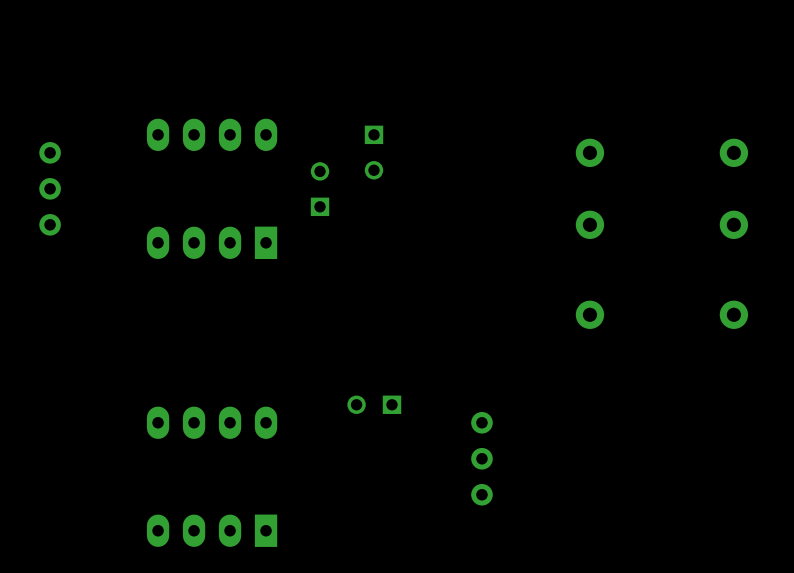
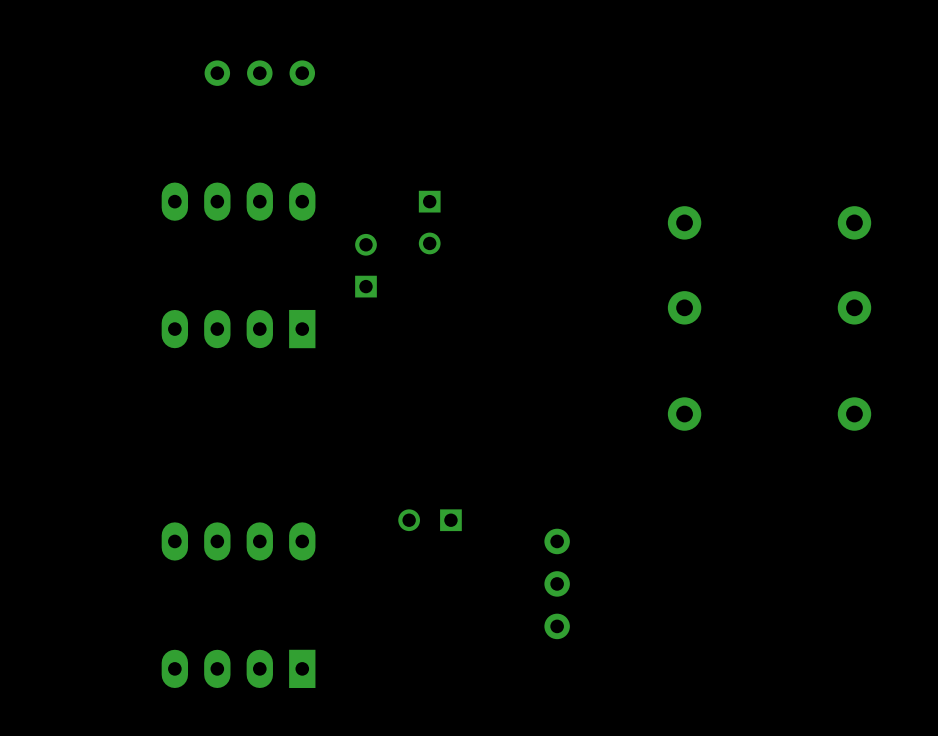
part rotation: 0° (50, 188) -> 90° clockwise (259, 73)
part position: (50, 188) -> (259, 73)

